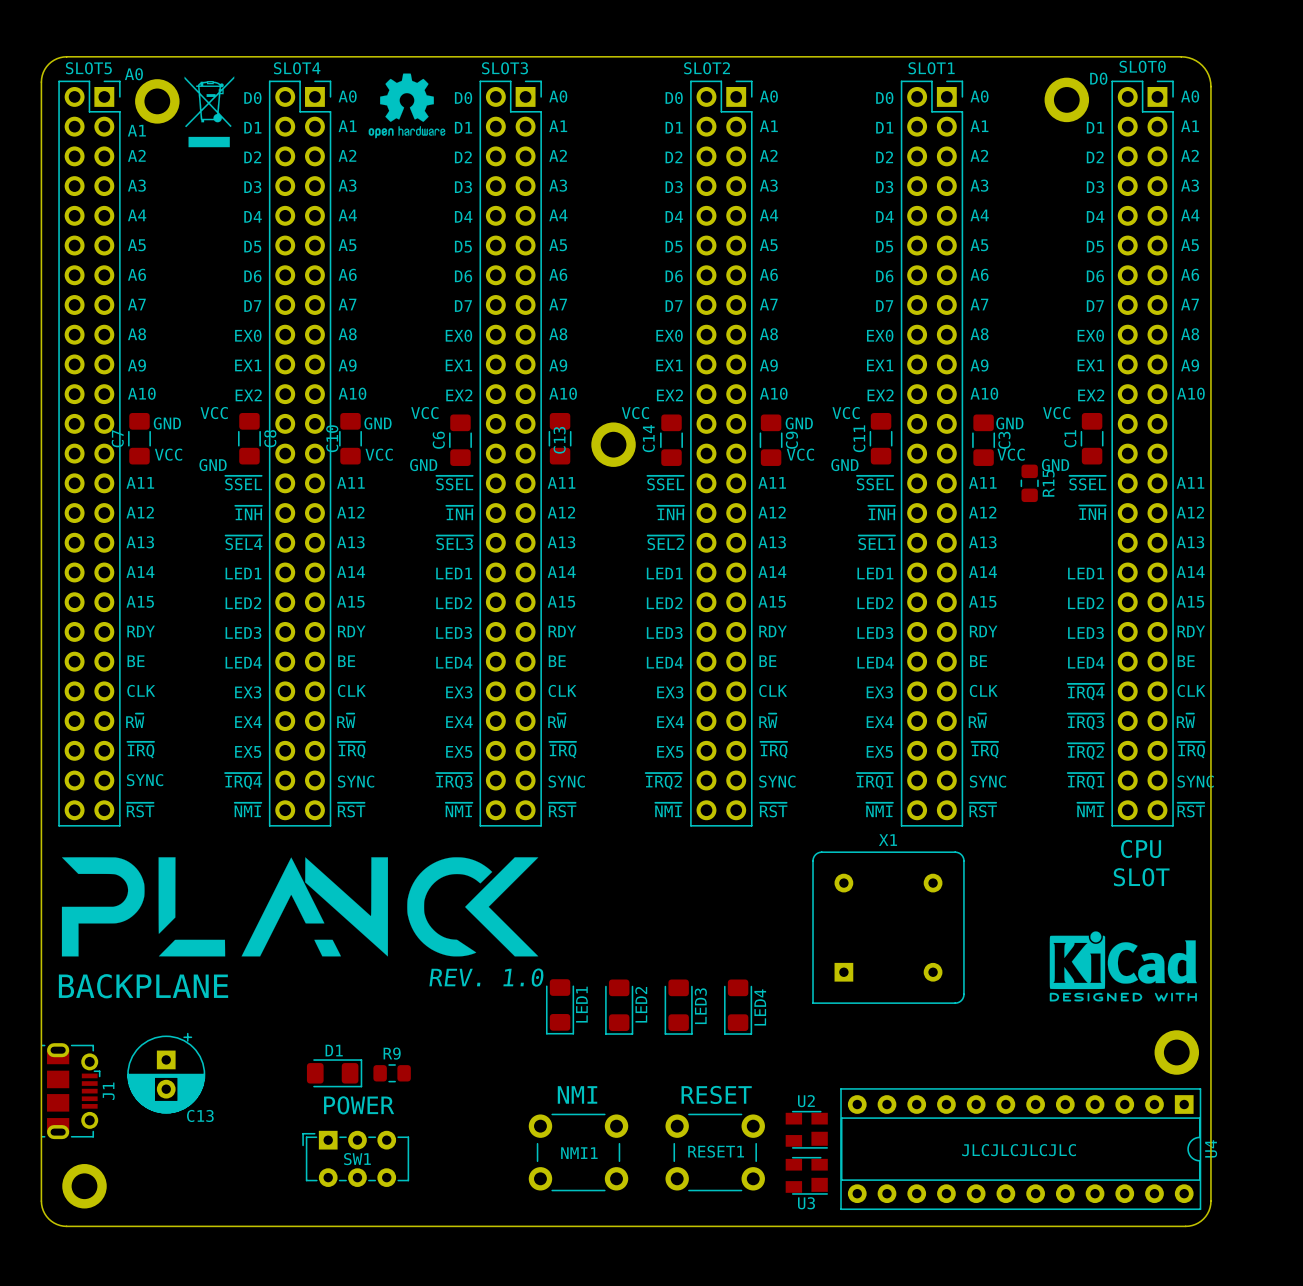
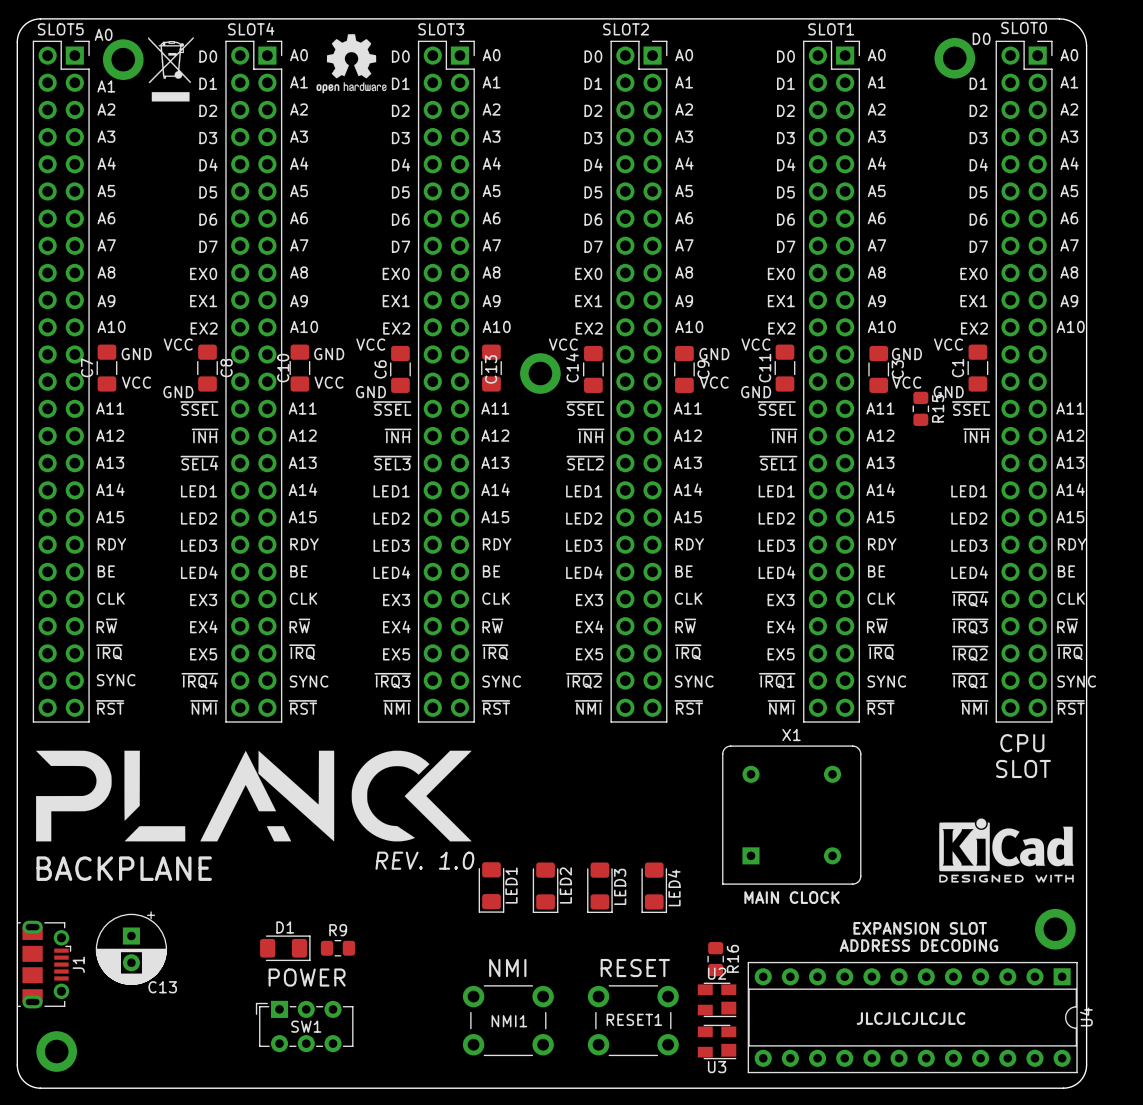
text: none -> MAIN CLOCK (792, 897)
text: none -> EXPANSION SLOT (920, 928)
text: none -> ADDRESS DECODING (918, 945)
R16: none -> (715, 959)

